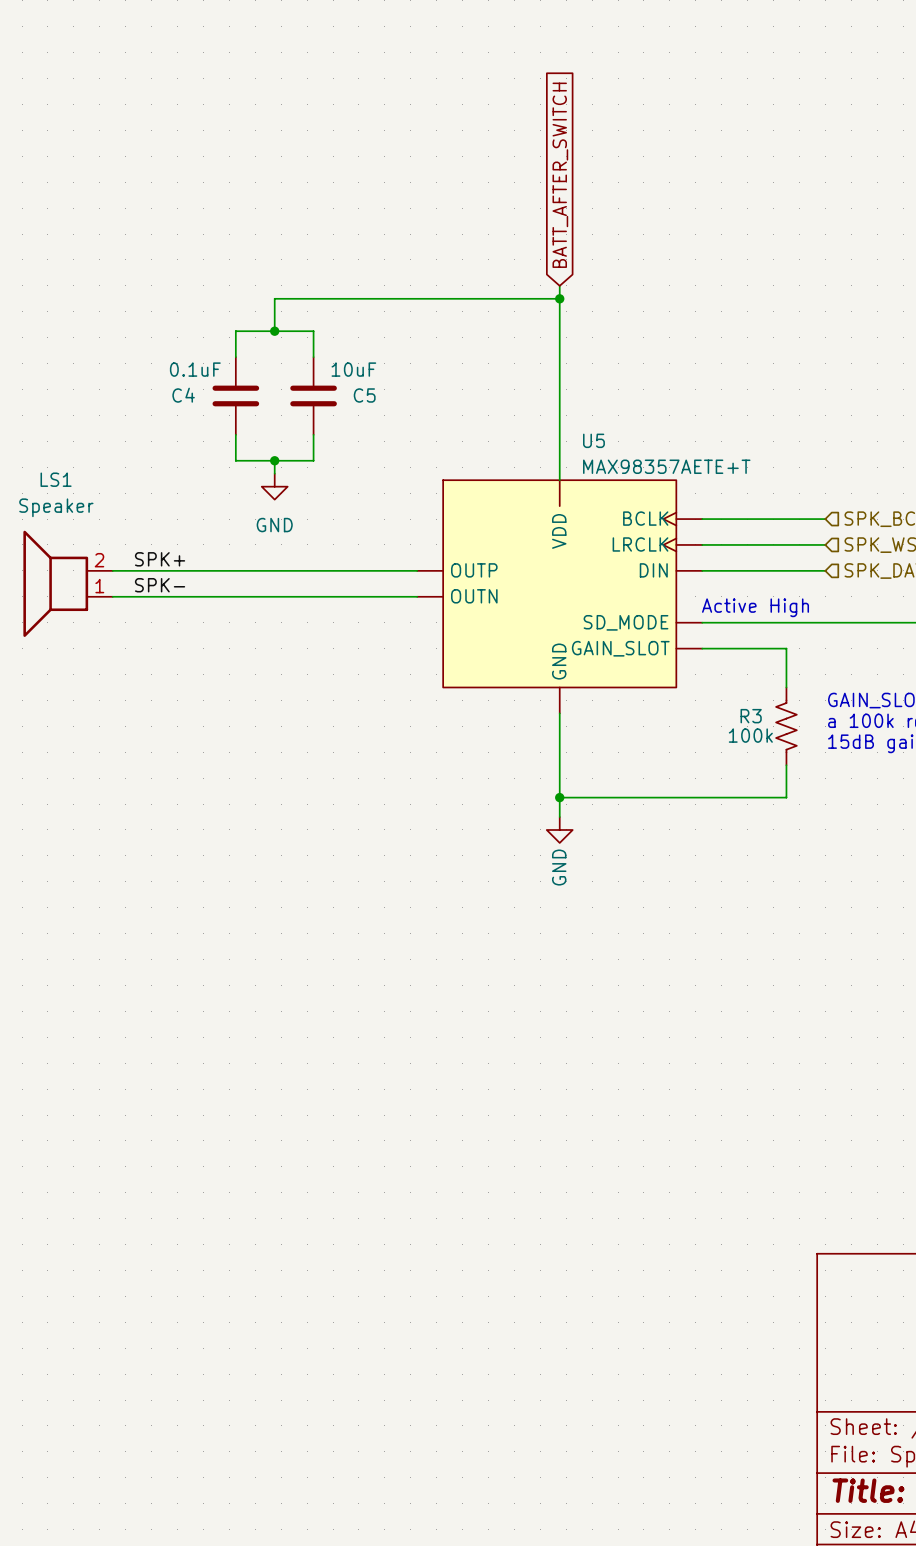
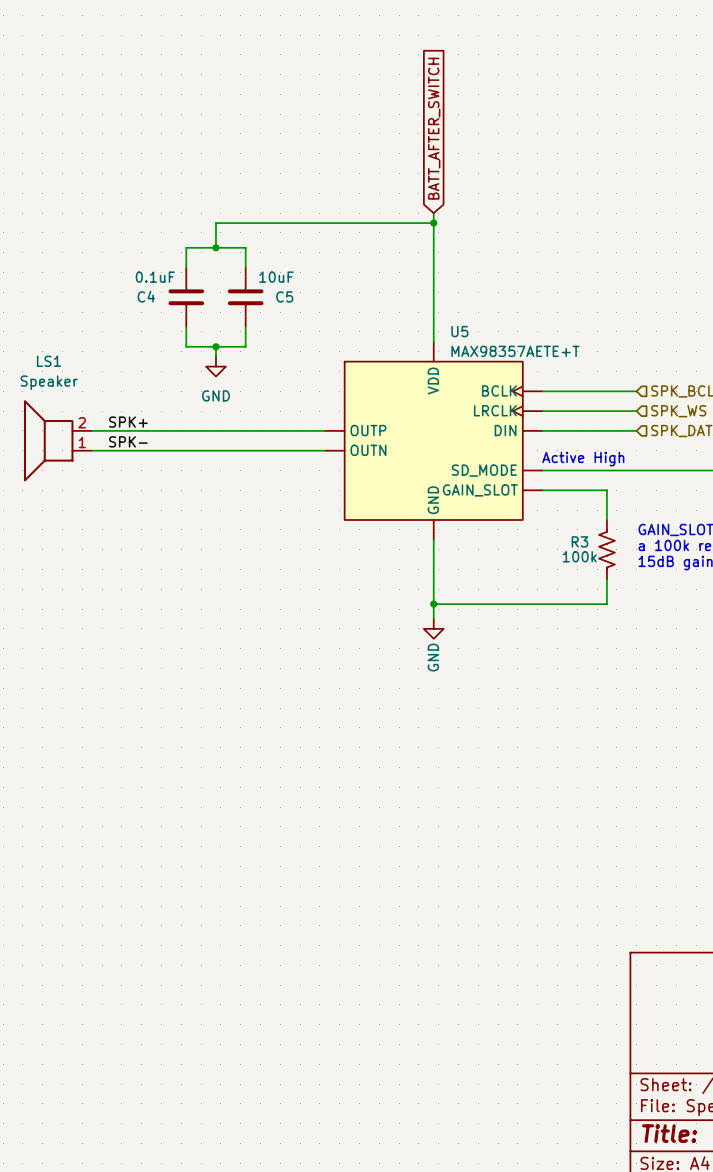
U5 symbol: [417, 480, 703, 714] -> [324, 341, 543, 540]

